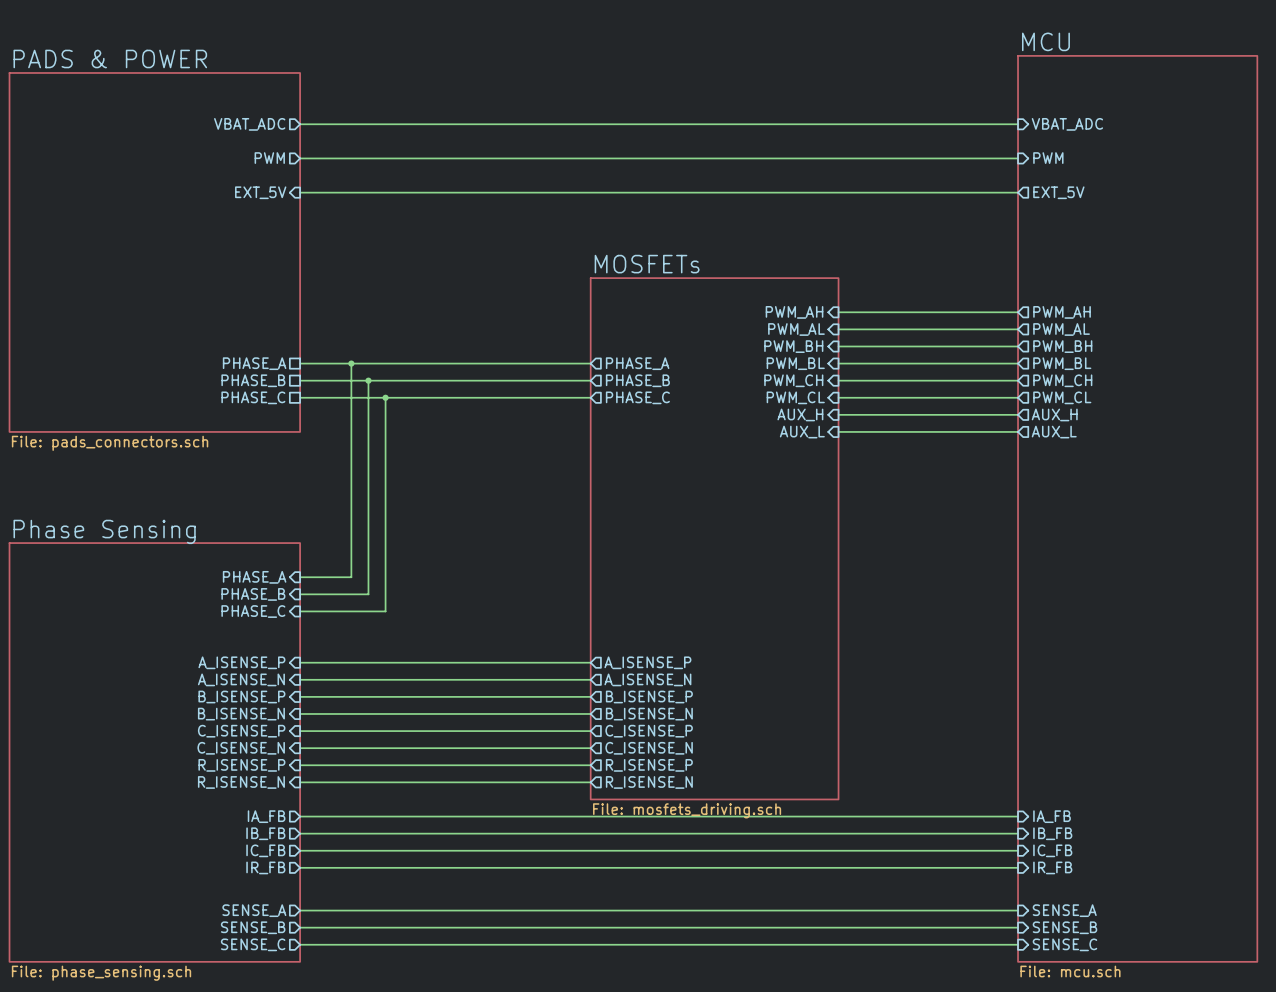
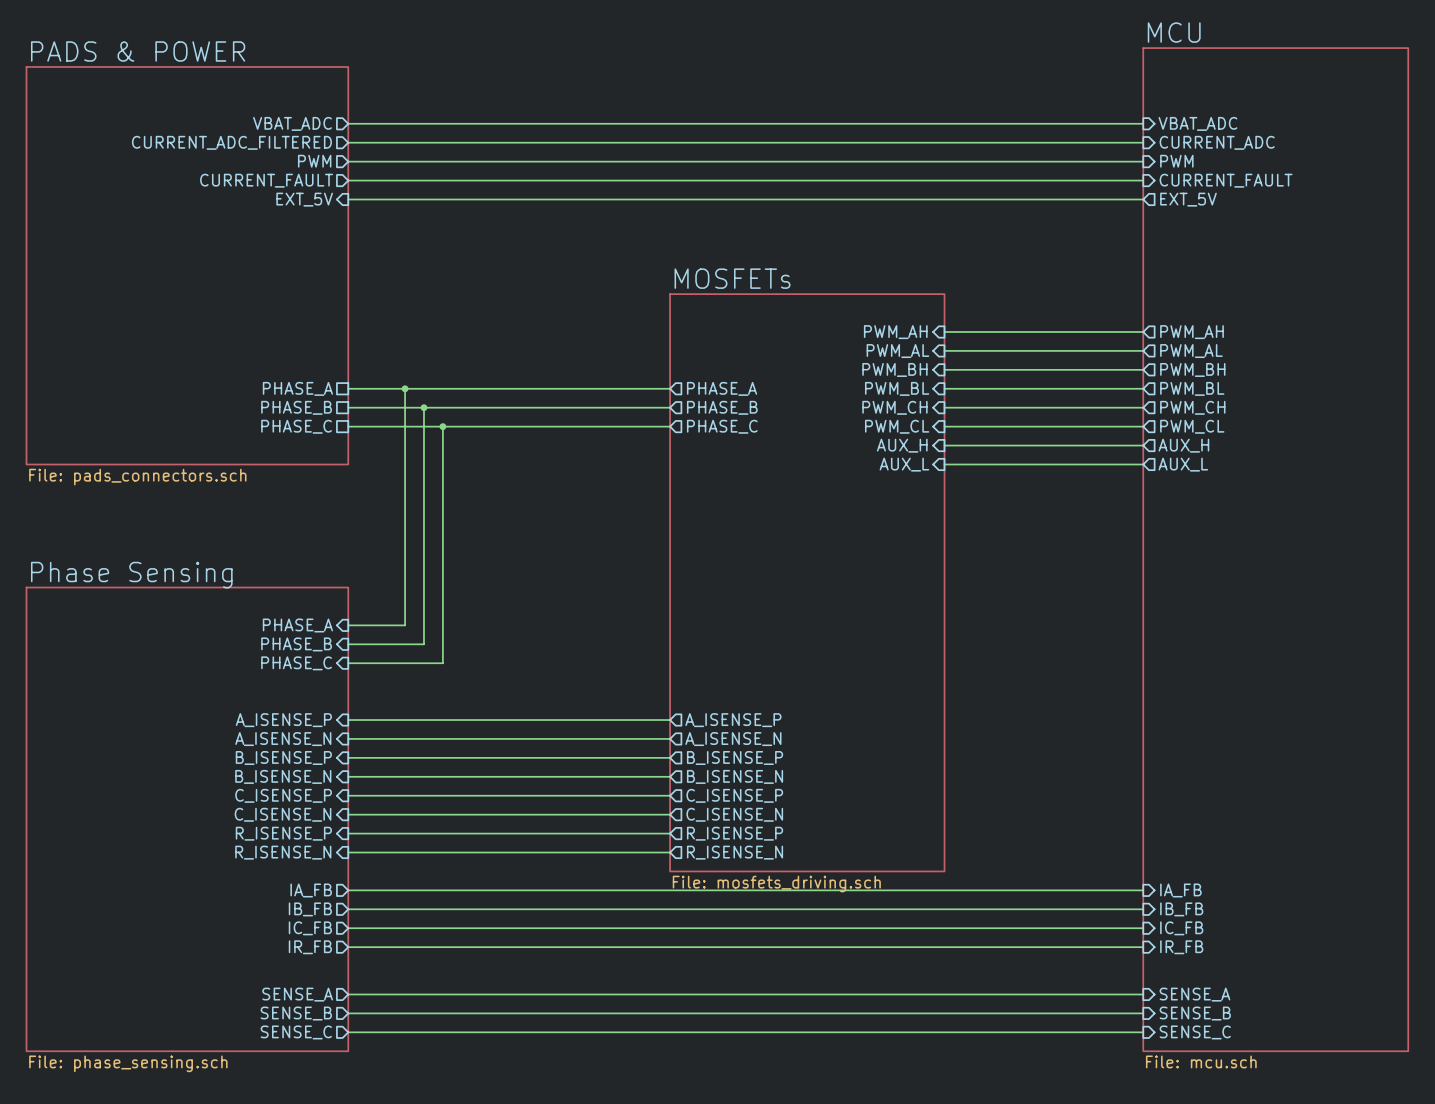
sheet pin: none -> CURRENT_ADC_FILTERED (231, 142)
wire: none -> (348, 142) (1143, 142)
sheet pin: none -> CURRENT_ADC (1217, 142)
sheet pin: none -> CURRENT_FAULT (266, 180)
wire: none -> (348, 180) (1143, 180)
sheet pin: none -> CURRENT_FAULT (1226, 180)

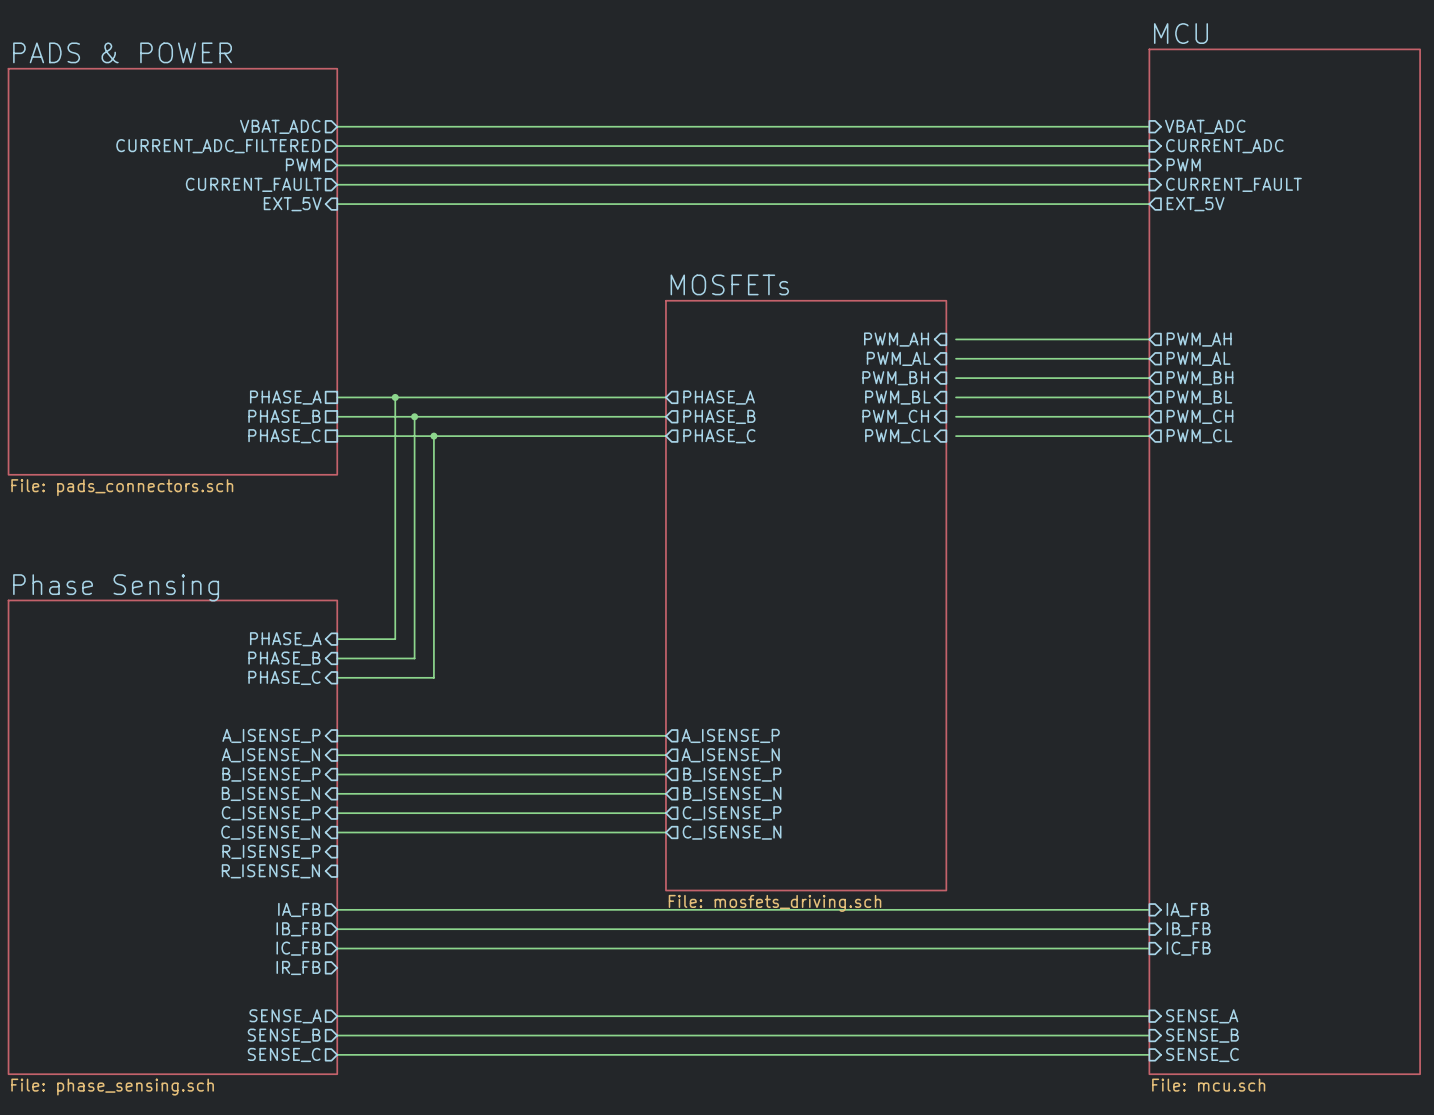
wire: (944, 331) (953, 331) -> none
wire: (944, 350) (953, 350) -> none
wire: (944, 369) (953, 369) -> none
wire: (944, 388) (953, 388) -> none
wire: (944, 407) (953, 407) -> none
wire: (944, 426) (953, 426) -> none
sheet pin: AUX_H (902, 445) -> none
wire: (944, 445) (1143, 445) -> none
sheet pin: AUX_H (1183, 445) -> none
sheet pin: AUX_L (904, 464) -> none
wire: (944, 464) (1143, 464) -> none
sheet pin: AUX_L (1183, 464) -> none
wire: (348, 833) (670, 833) -> none
sheet pin: R_ISENSE_P (735, 833) -> none
wire: (348, 852) (670, 852) -> none
sheet pin: R_ISENSE_N (735, 852) -> none
wire: (348, 947) (1143, 947) -> none
sheet pin: IR_FB (1181, 947) -> none

